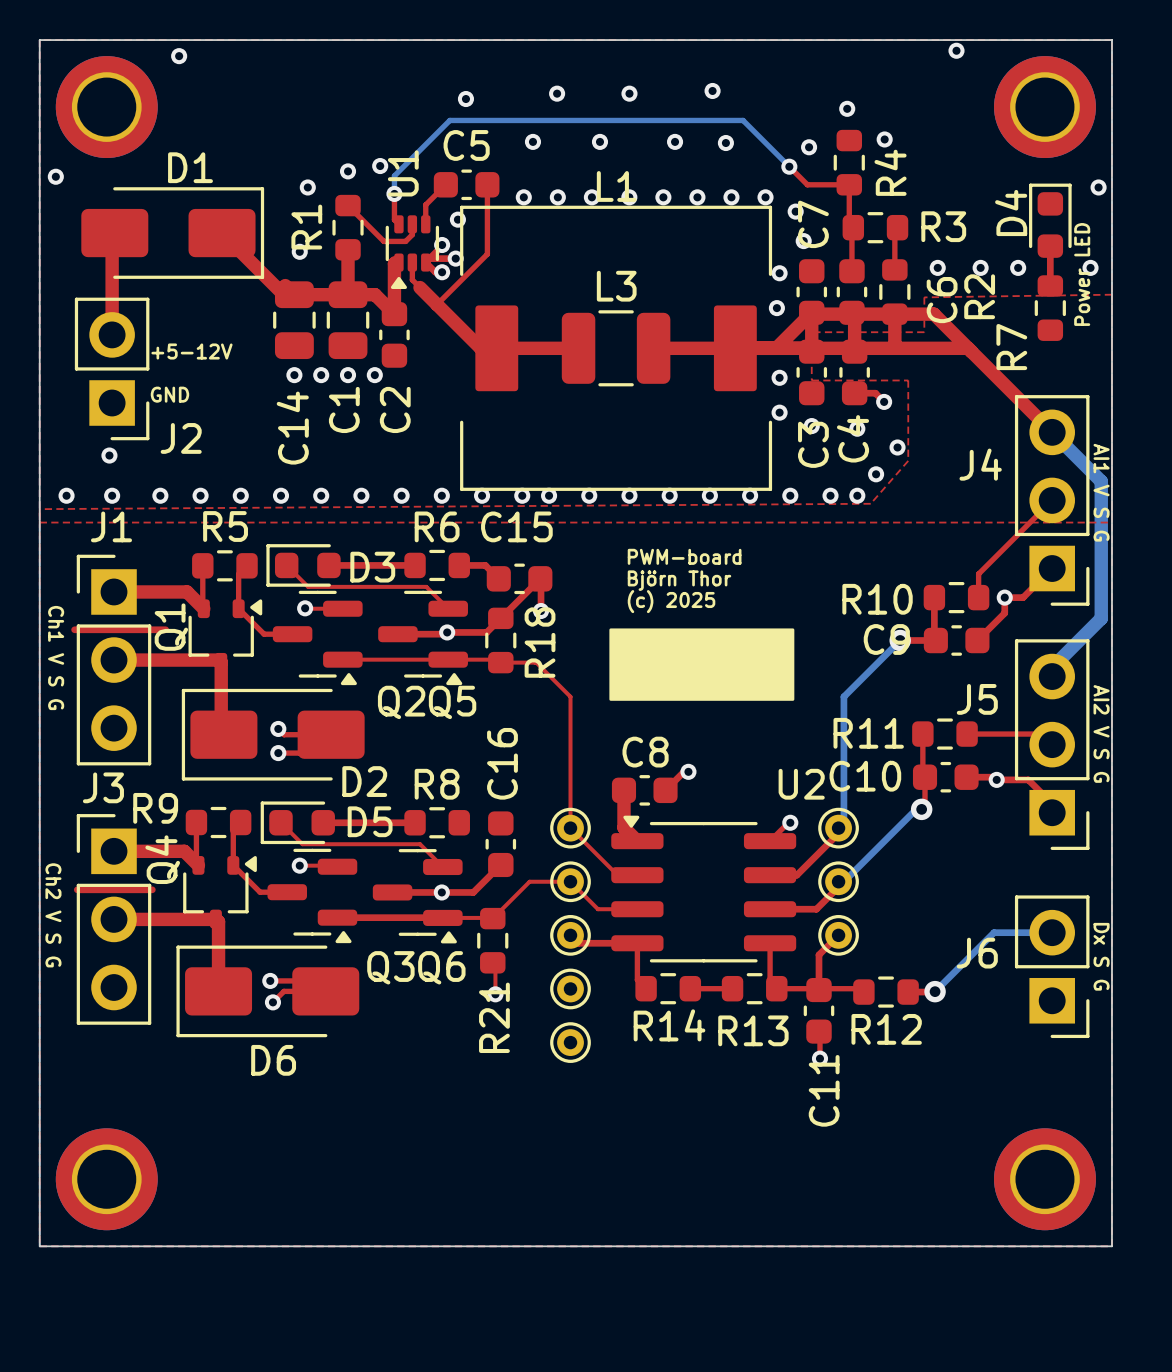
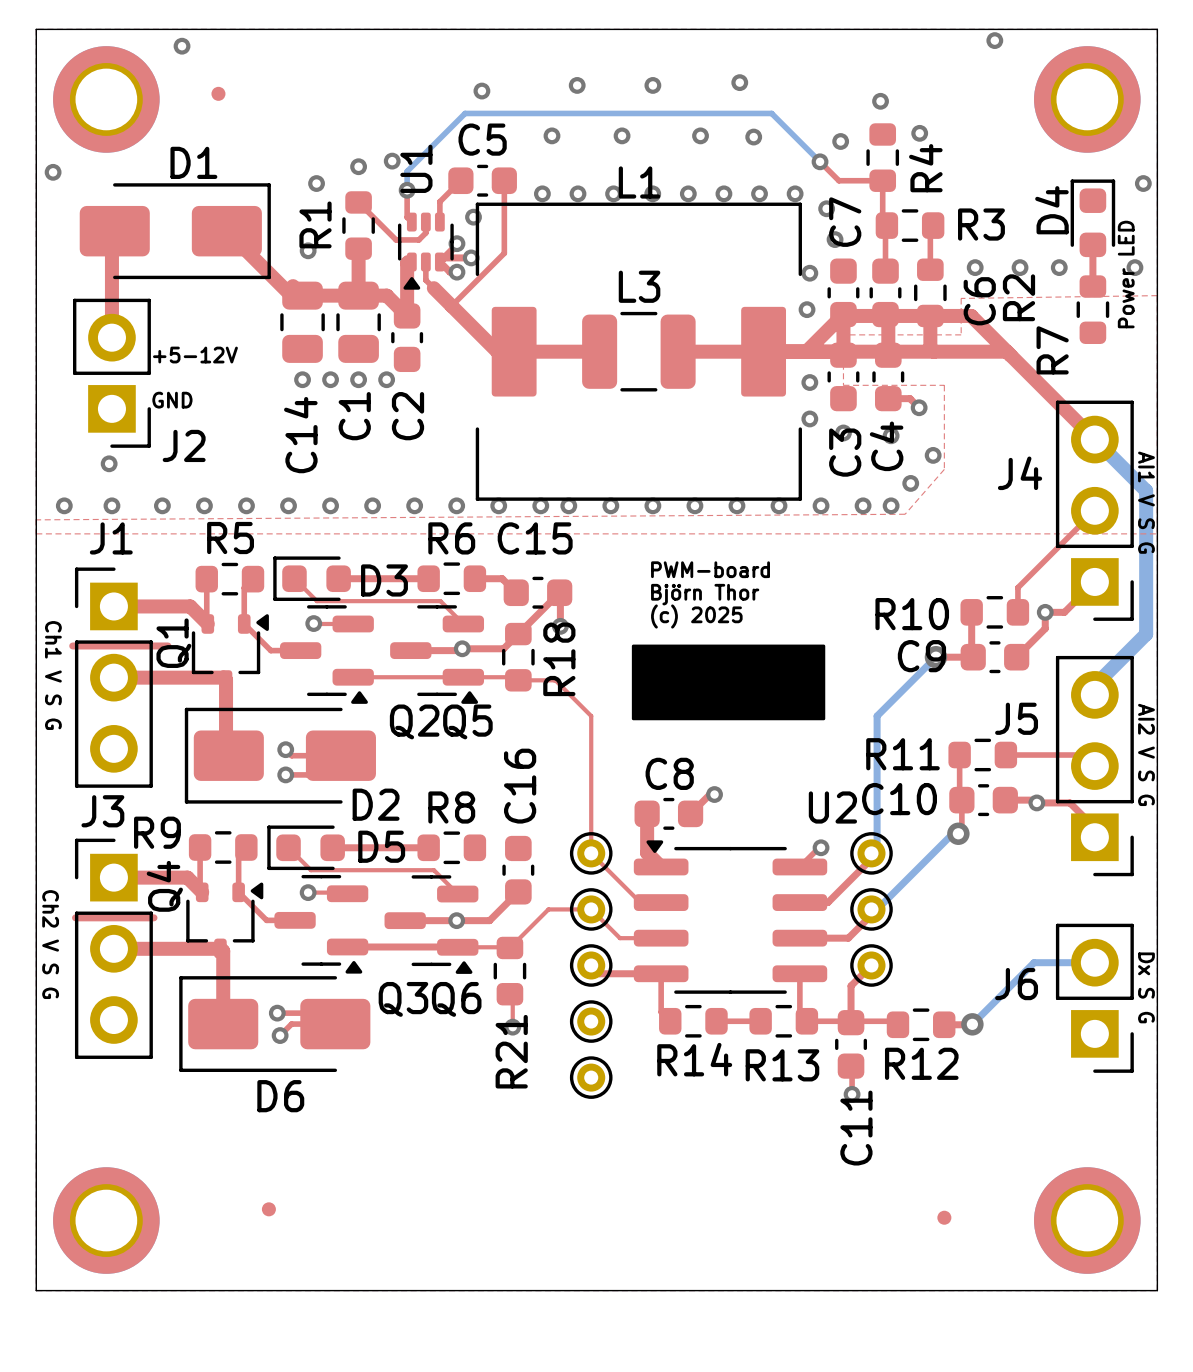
part: none -> (218, 93)
part: none -> (268, 1209)
part: none -> (944, 1217)

